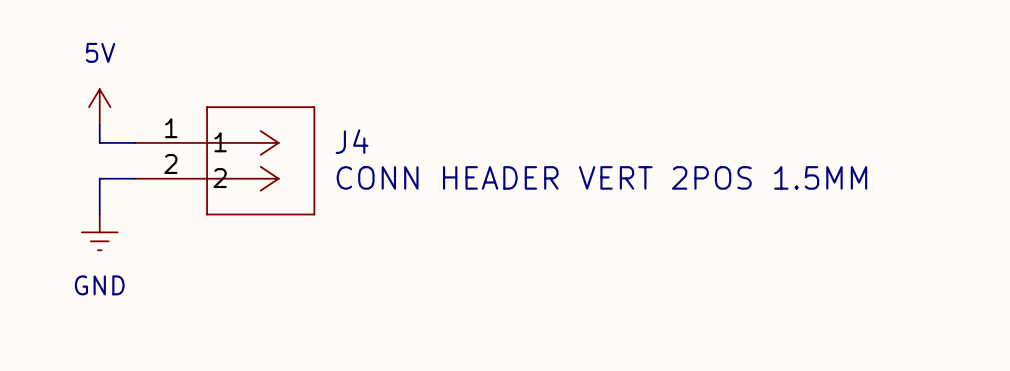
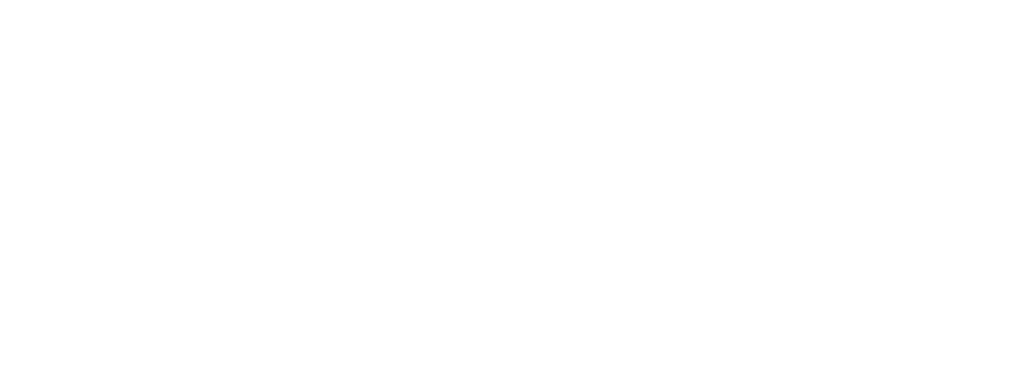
power symbol: 5V (99, 107) -> none
wire: (99, 125) (99, 142) (135, 142) -> none
J4: CONN HEADER VERT 2POS 1.5MM (225, 160) -> none
wire: (135, 178) (99, 178) (99, 214) -> none
power symbol: GND (99, 232) -> none

